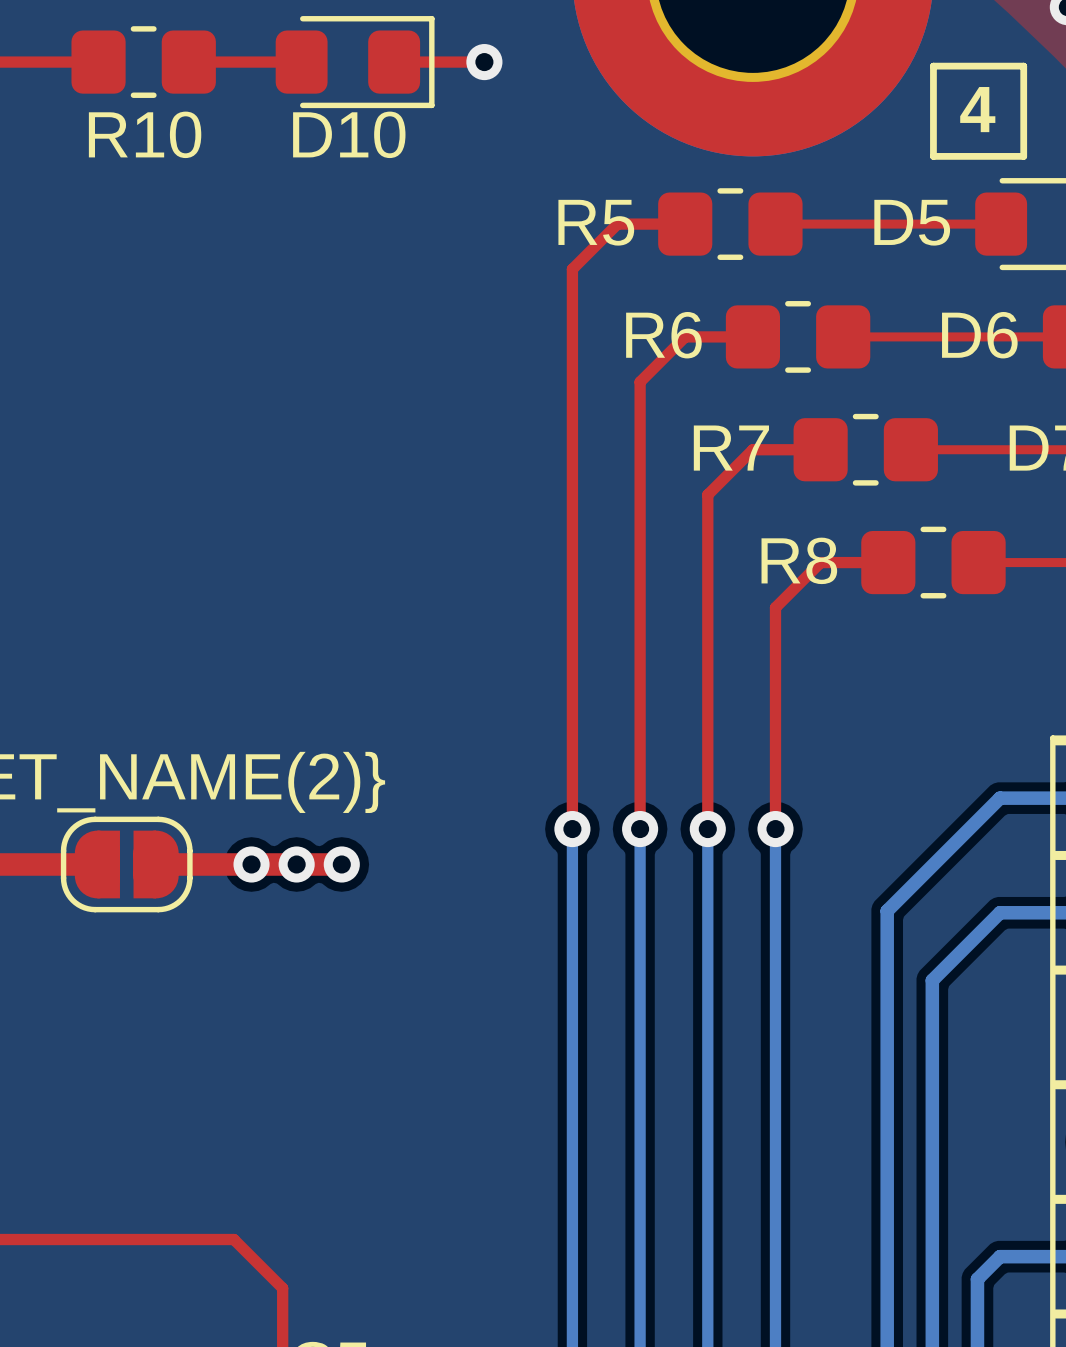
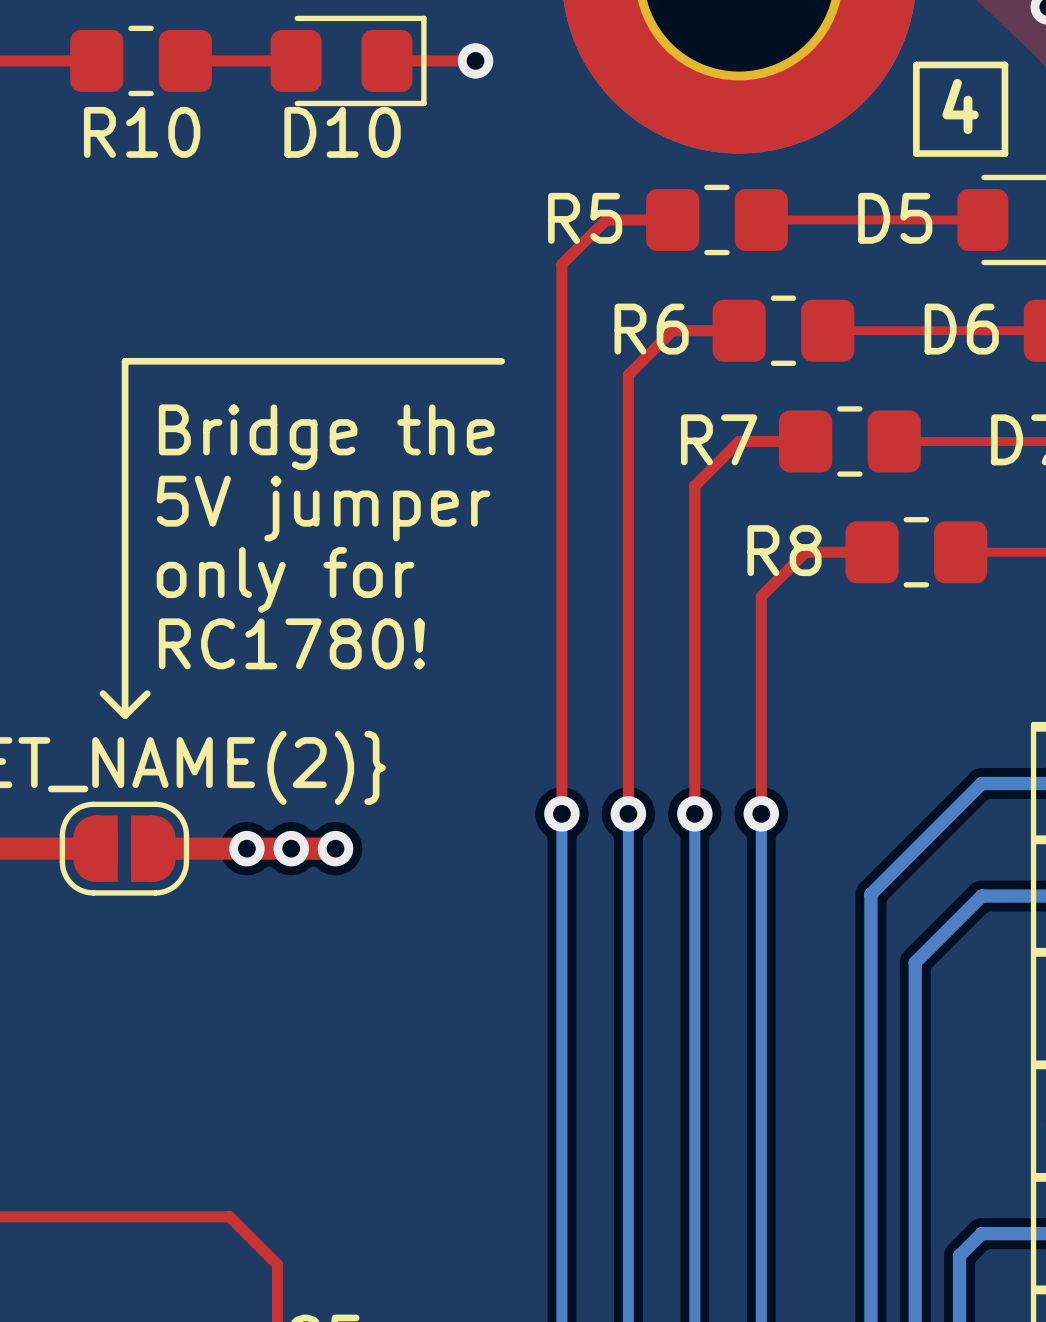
line: none -> (501, 361) (125, 361) (125, 715)
text: none -> Bridge the (326, 437)
text: none -> 5V jumper (323, 508)
text: none -> only for (285, 579)
text: none -> RC1780! (291, 643)
line: none -> (102, 693) (125, 715)
line: none -> (147, 693) (125, 715)

